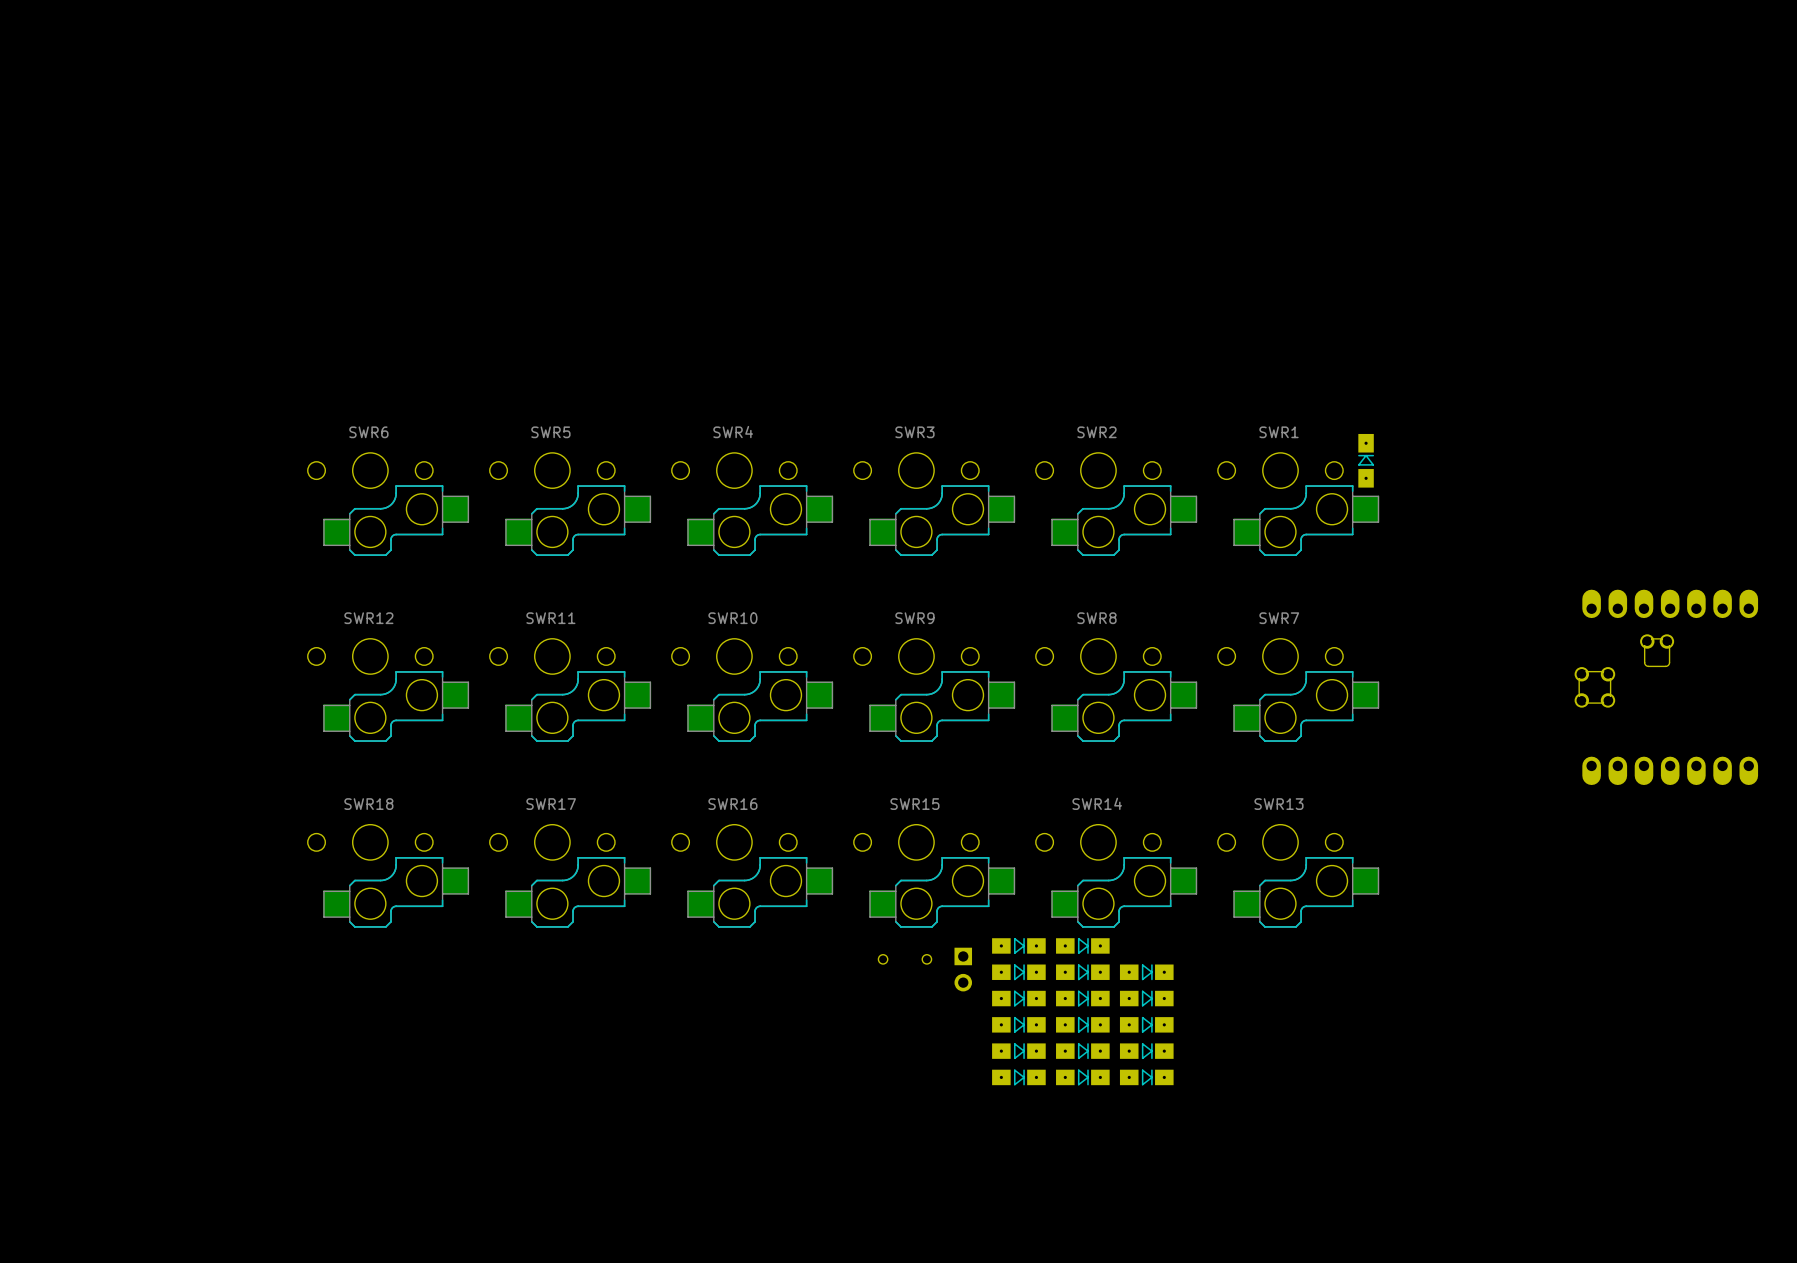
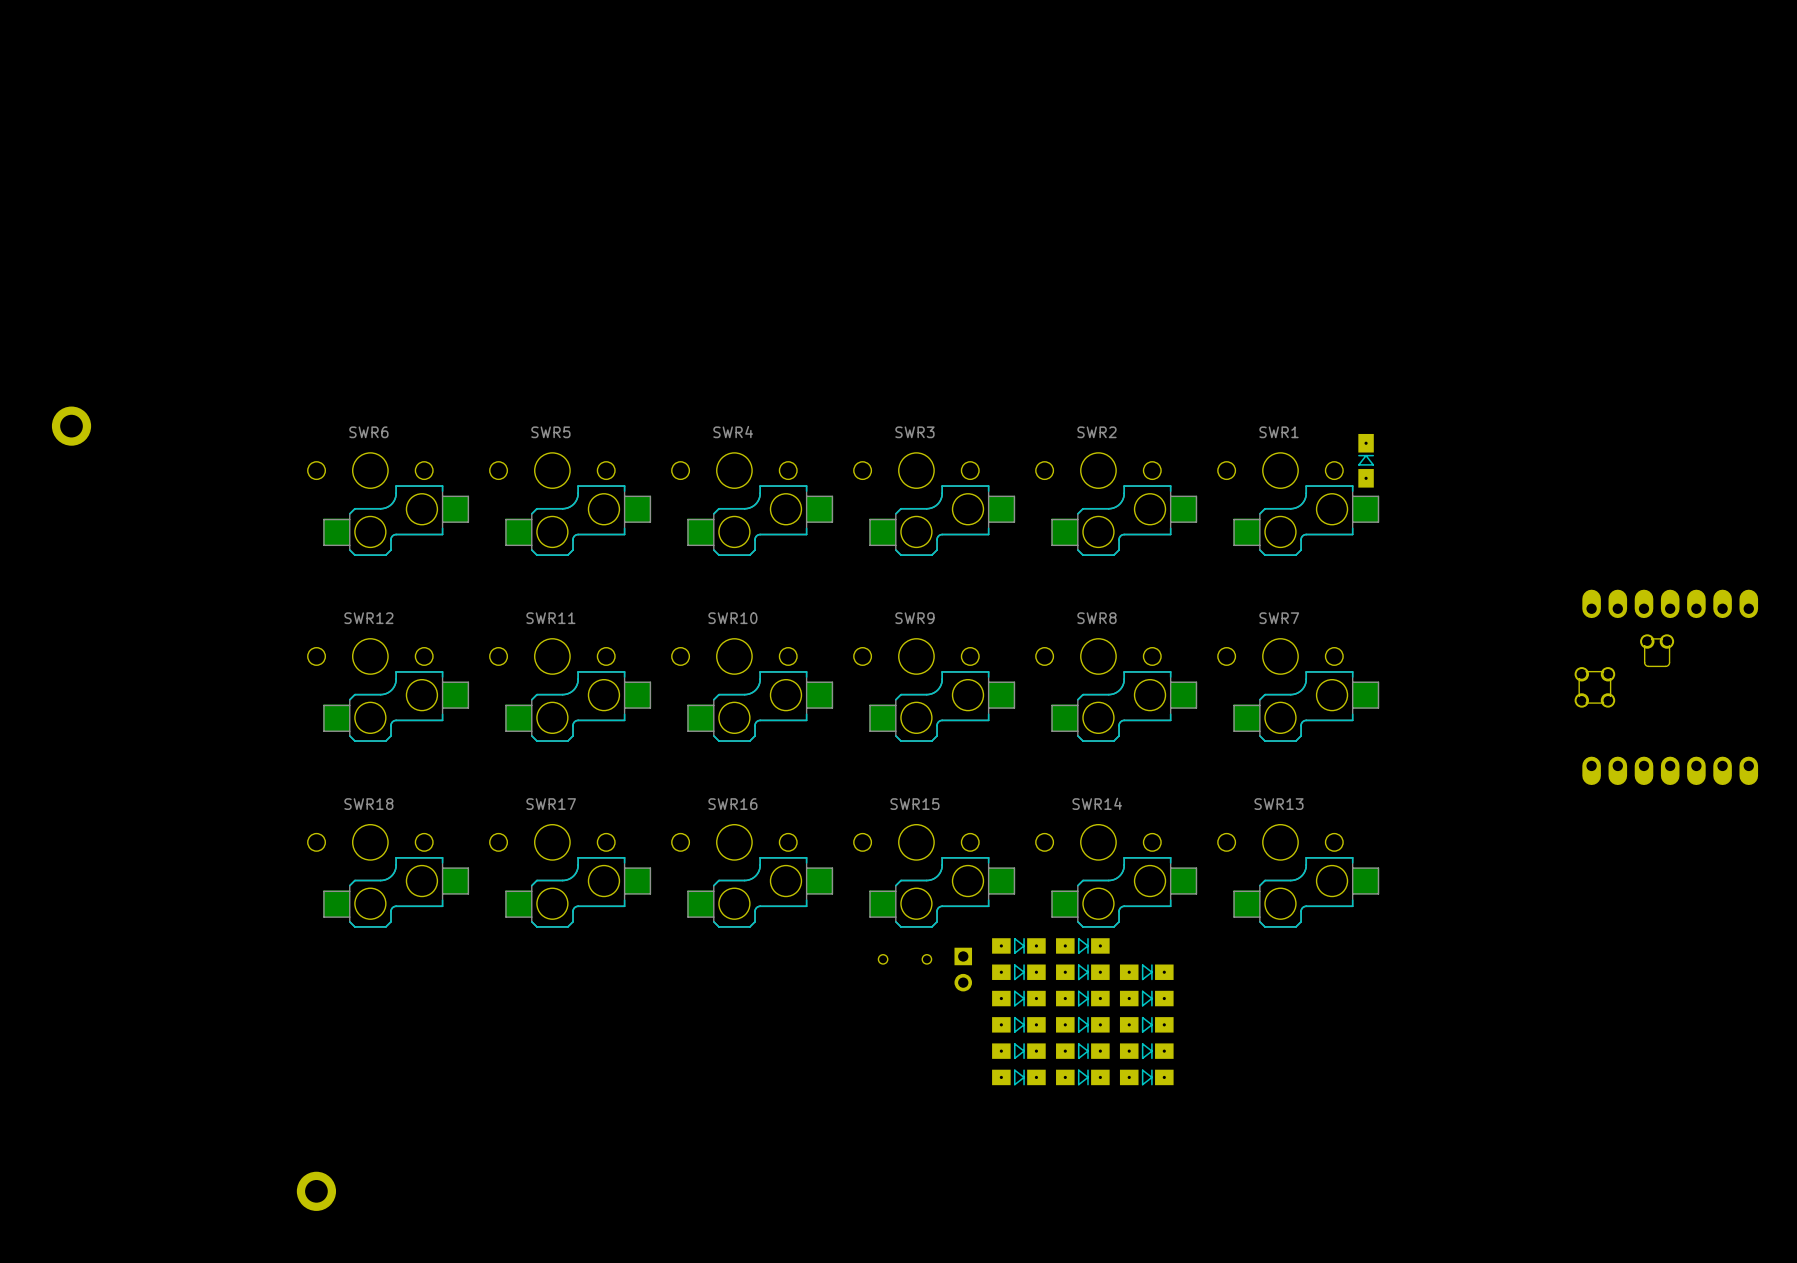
part: none -> (71, 426)
part: none -> (316, 1191)

